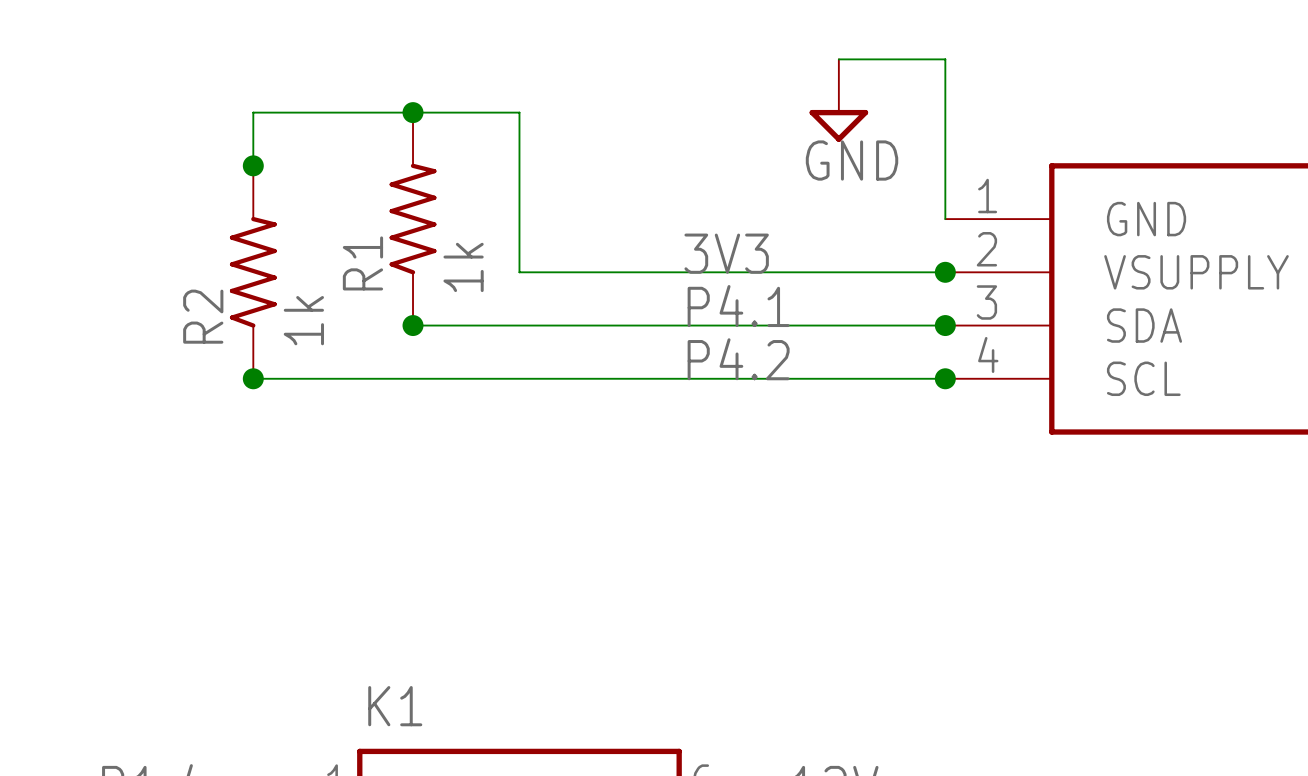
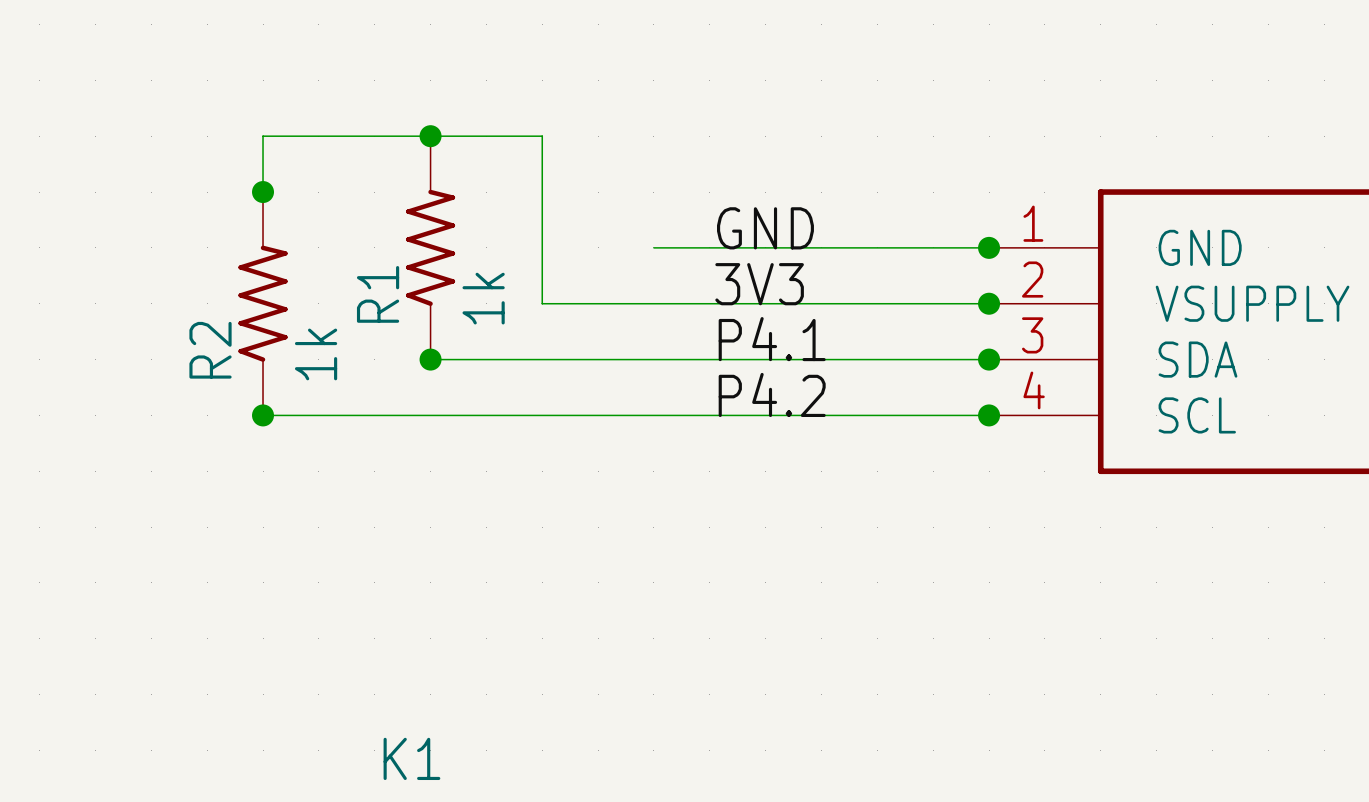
wire: (838, 59) (945, 59) (945, 219) -> (653, 247) (989, 247)
power symbol: GND (838, 100) -> none
label: none -> GND (765, 228)
junction: none -> (989, 247)

